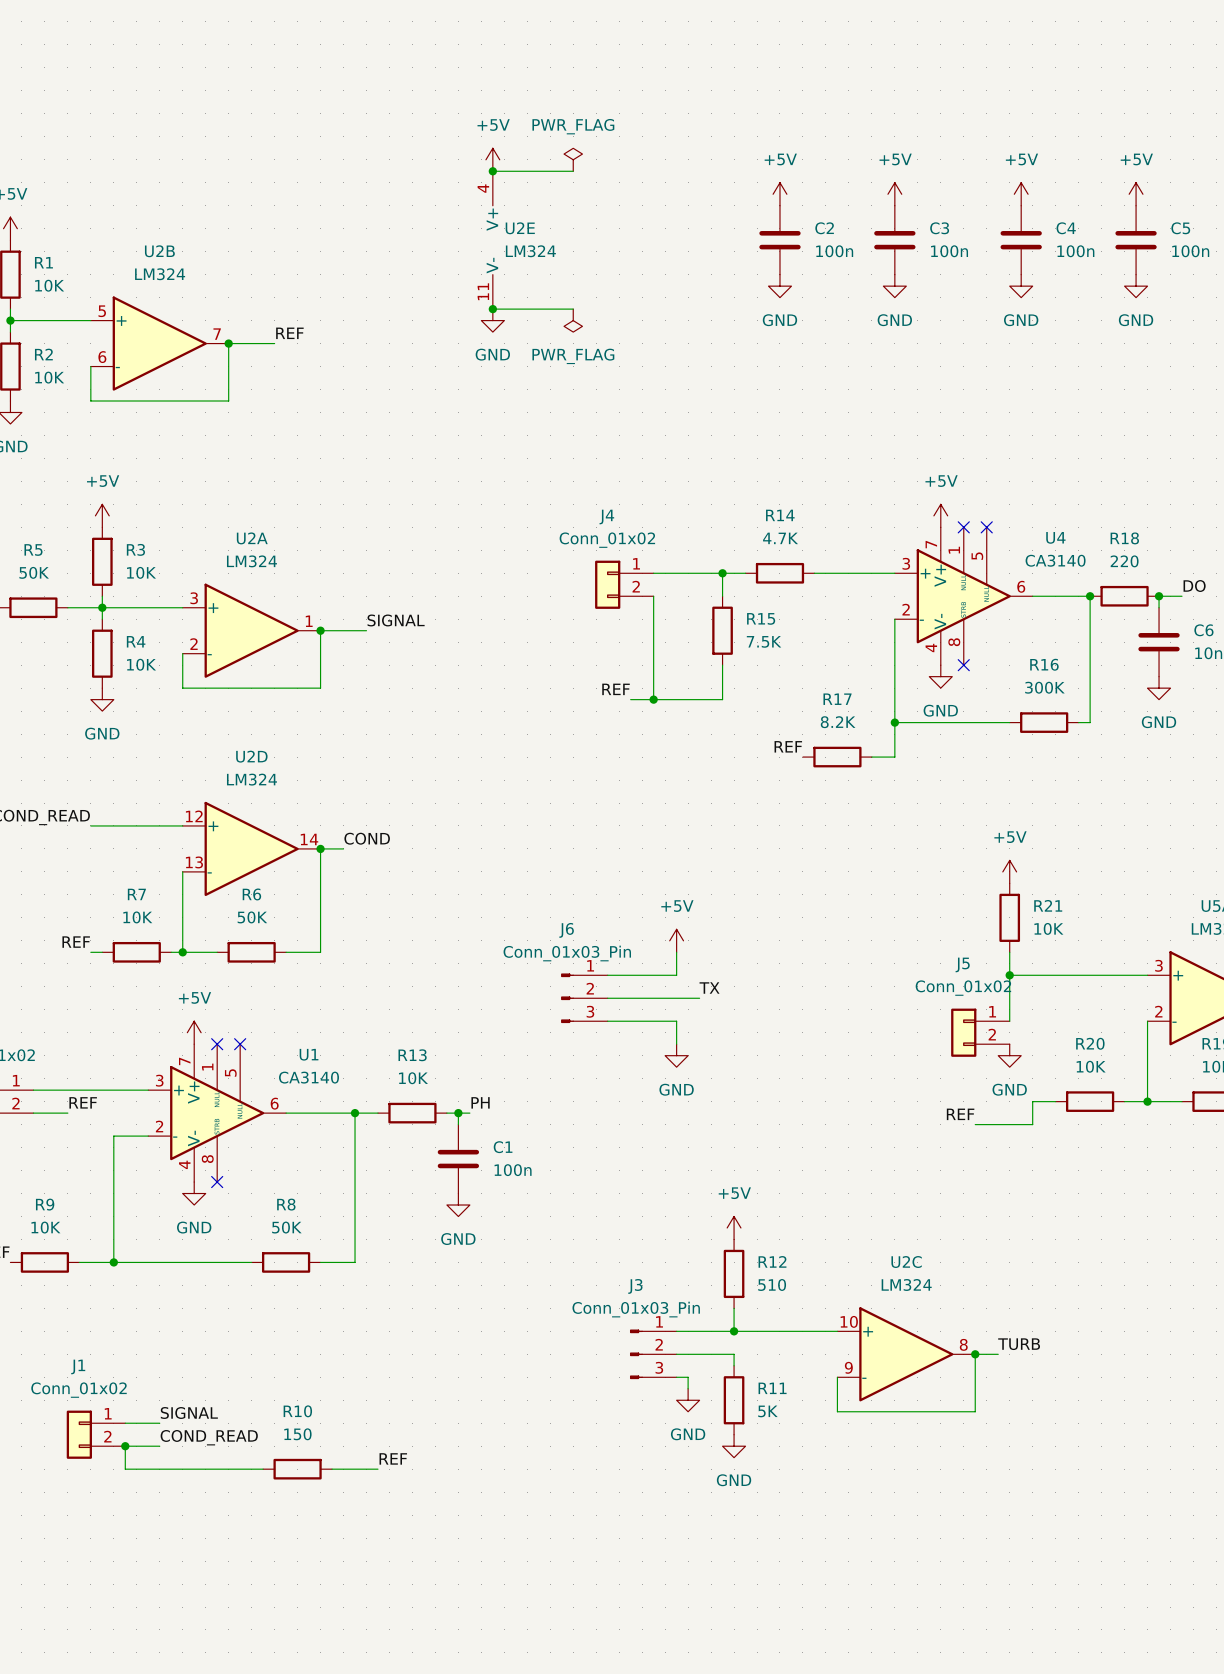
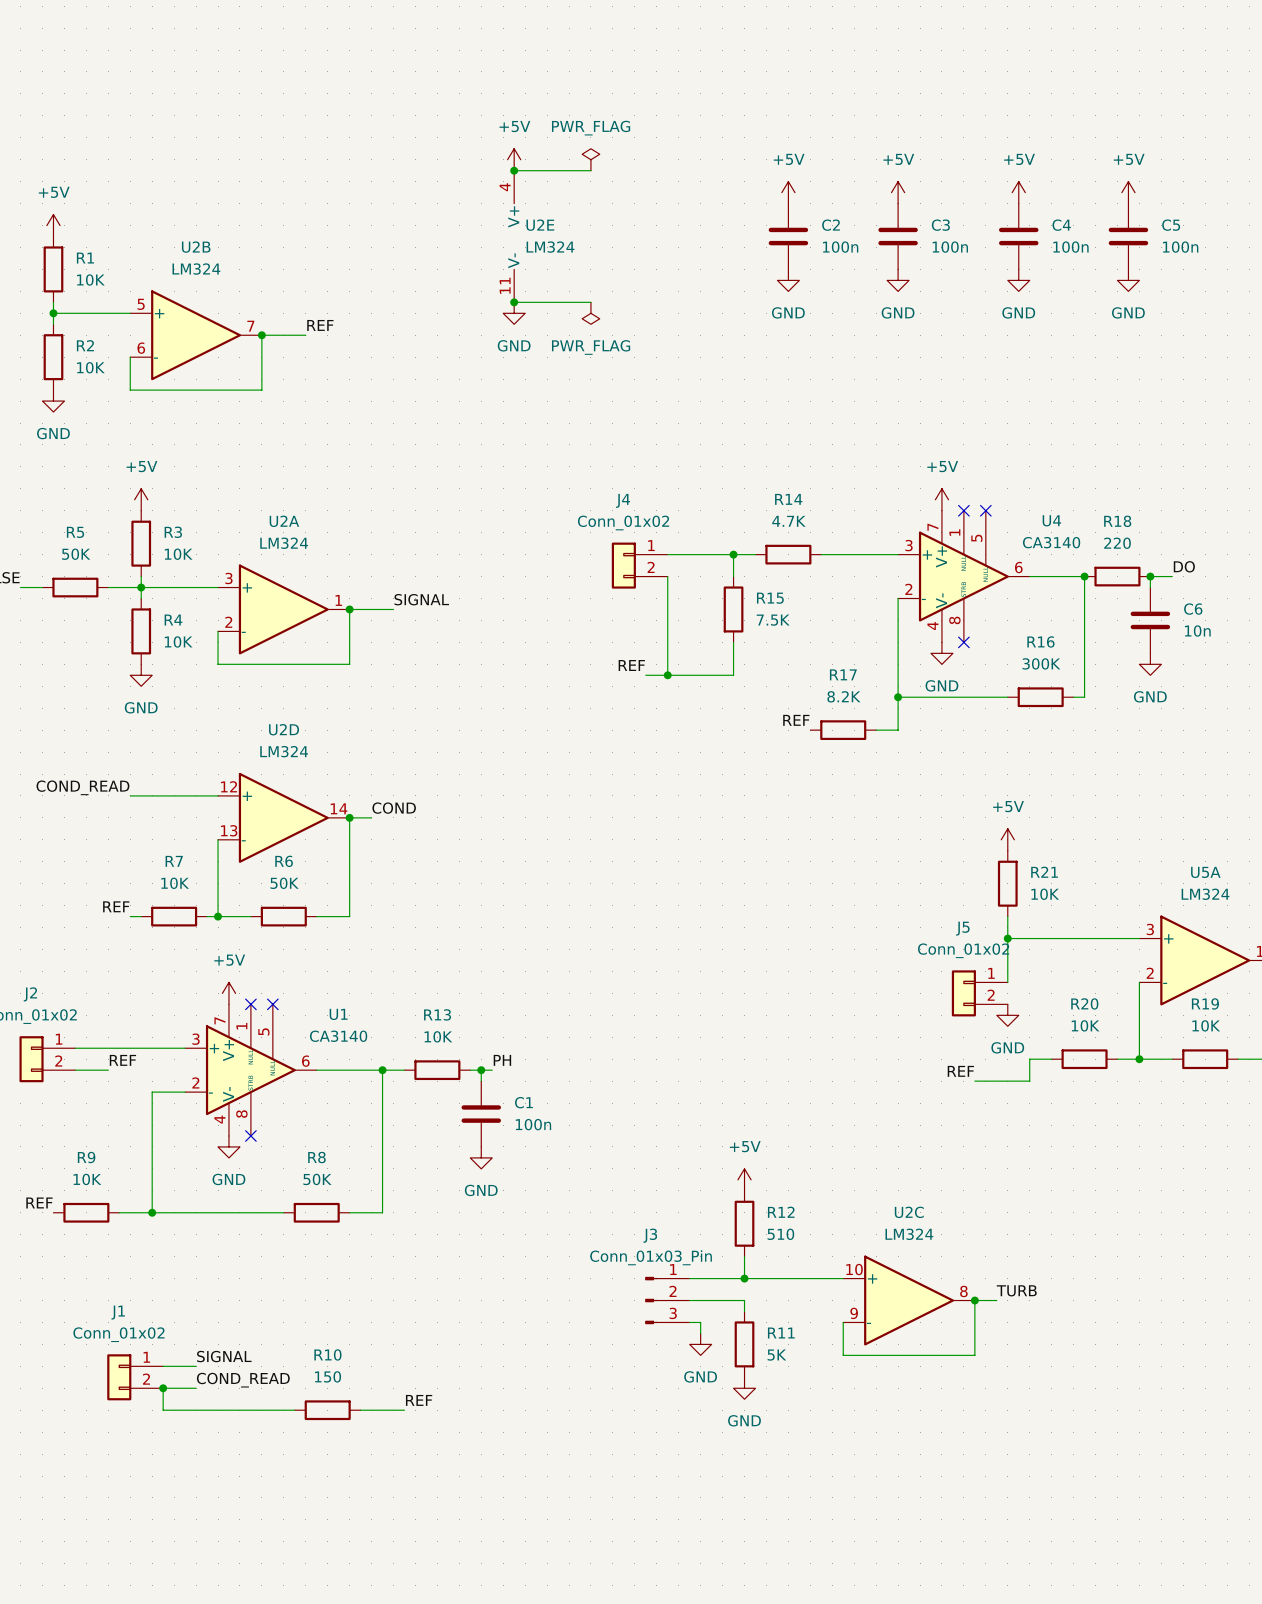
power symbol: +5V (676, 940) -> none
wire: (676, 952) (676, 975) (607, 975) -> none
label: TX (709, 988) -> none
J6: Conn_01x03_Pin (584, 998) -> none
wire: (607, 998) (699, 998) -> none
wire: (607, 1021) (676, 1021) (676, 1044) -> none
power symbol: GND (676, 1055) -> none

